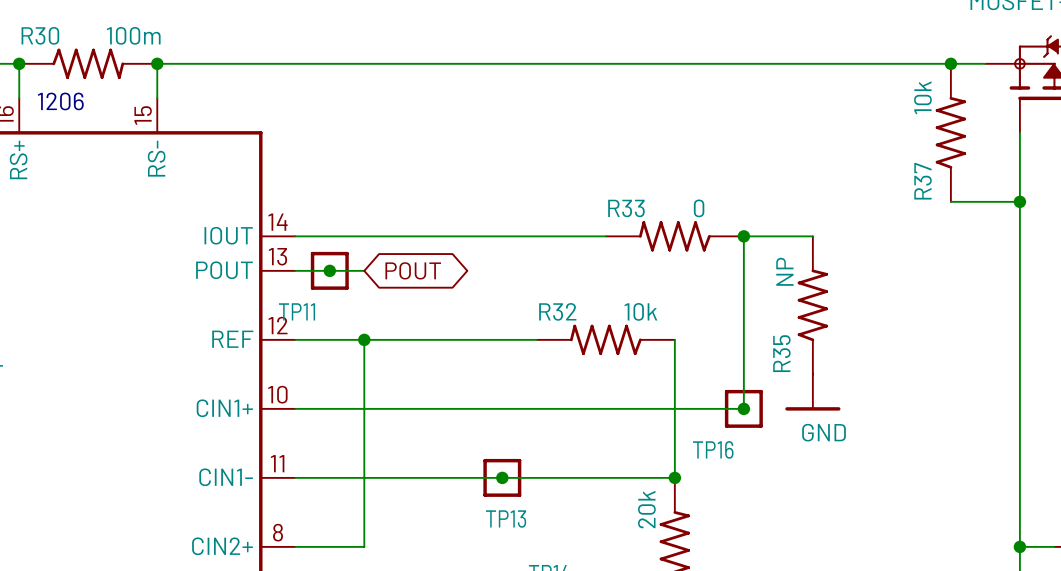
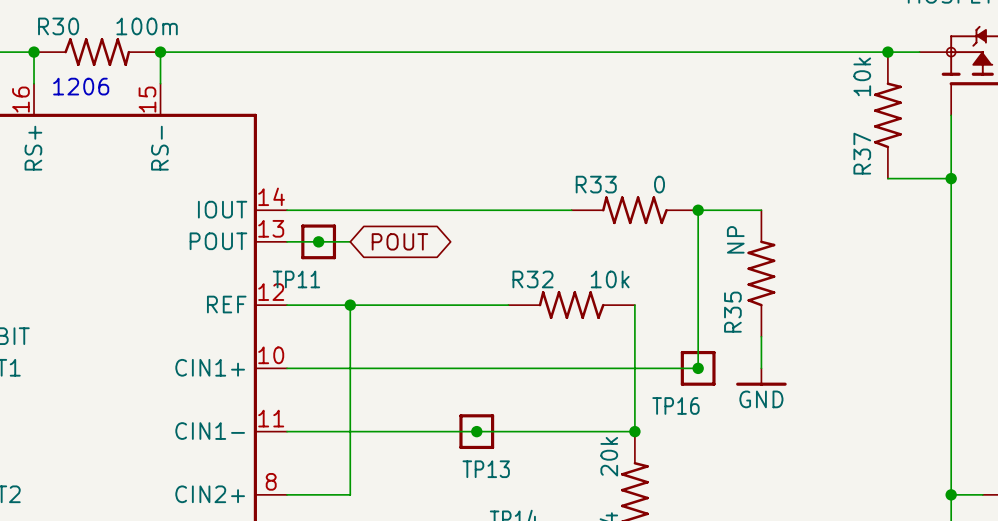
power symbol: GND (812, 392) -> none
power symbol: none -> GND (761, 377)

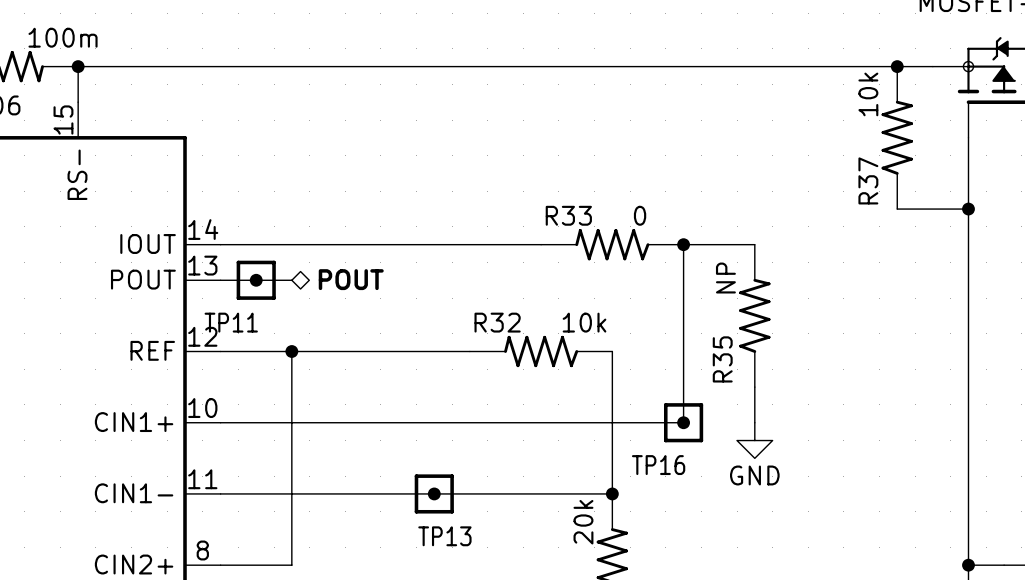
global label: POUT (399, 241) -> none
hierarchical label: none -> POUT (351, 279)
power symbol shape: [736, 368, 787, 386] -> [737, 422, 773, 459]

